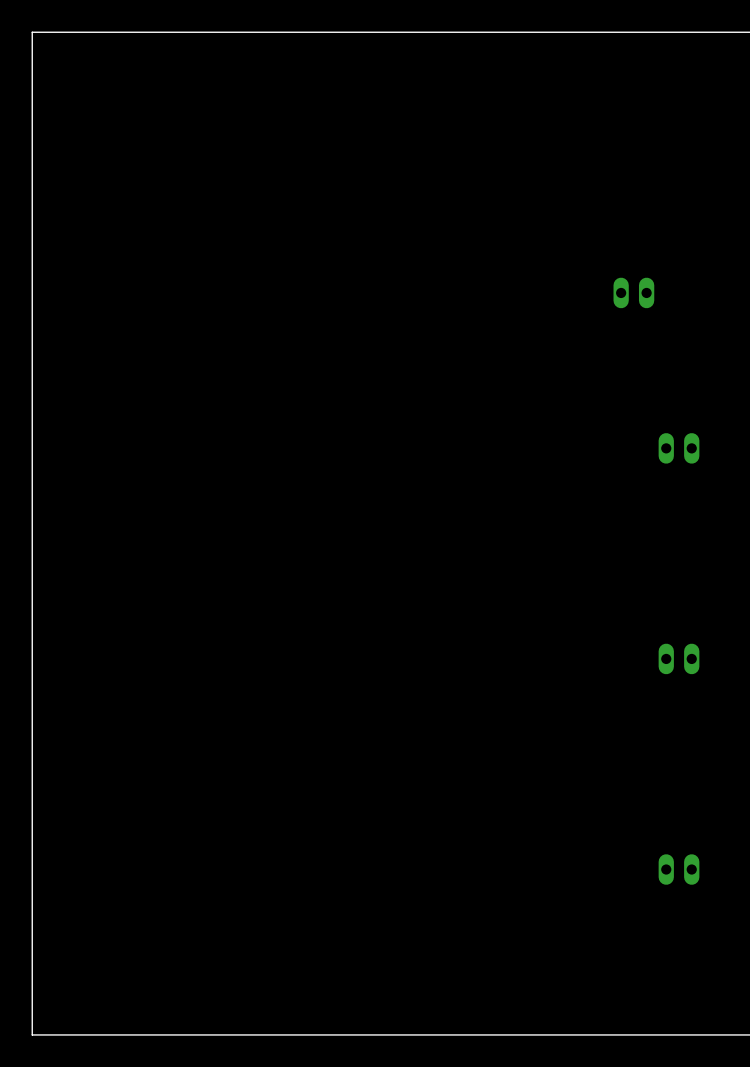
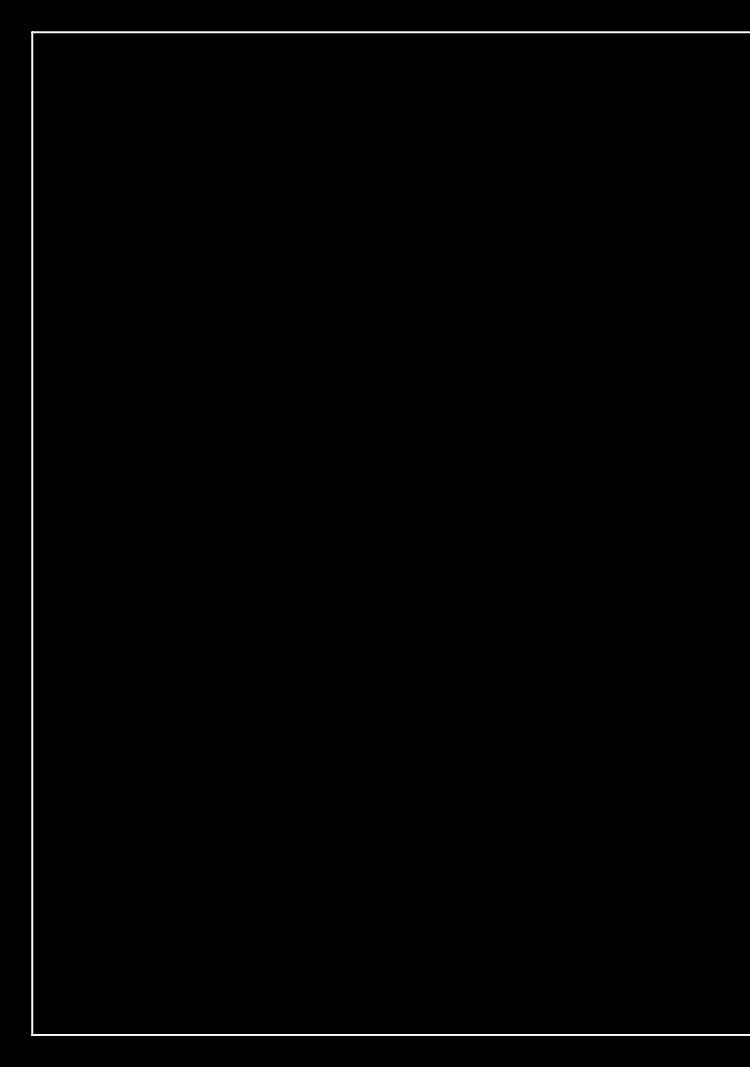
part: (633, 292) -> none
part: (679, 448) -> none
part: (679, 658) -> none
part: (679, 869) -> none

